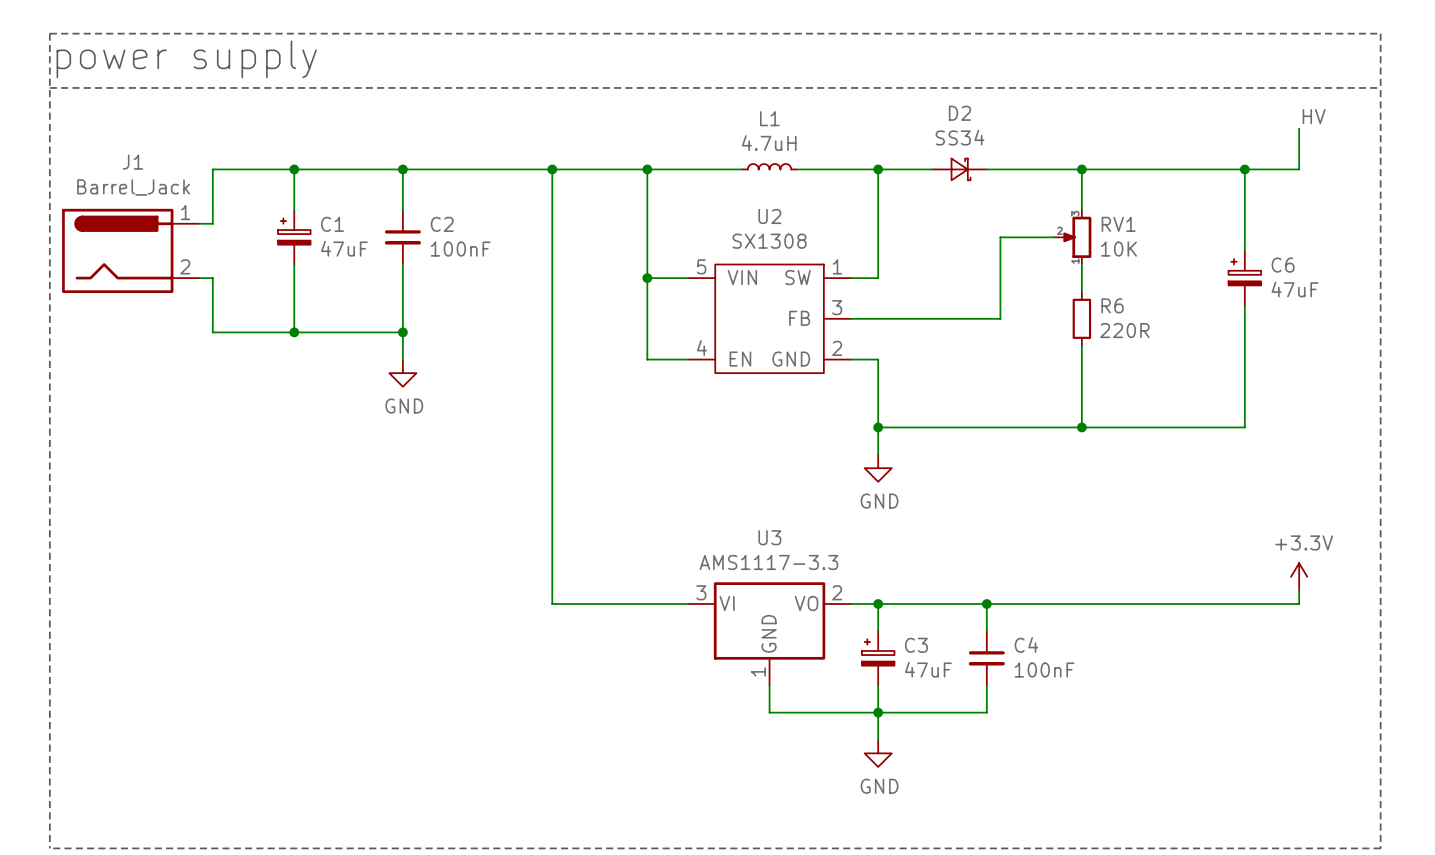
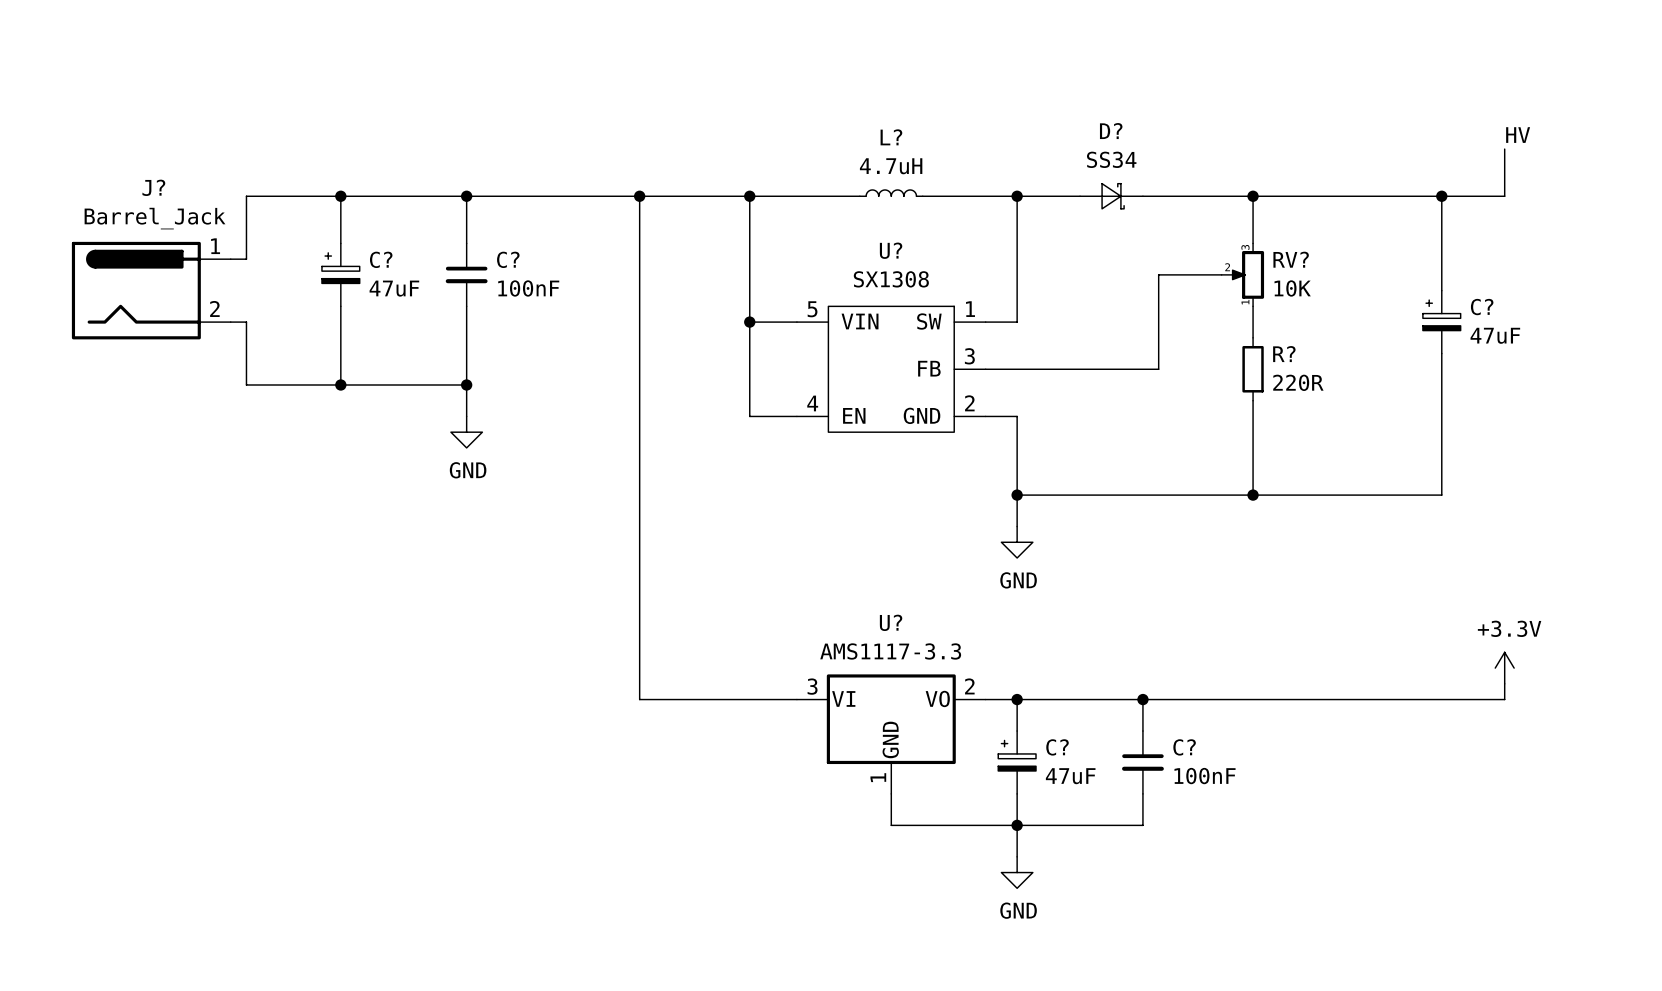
line: (49, 33) (1380, 33) (1380, 848) (49, 848) (49, 33) -> none
text: power supply (186, 59) -> none
line: (49, 87) (1380, 87) -> none
D2 name: D2 (959, 113) -> D? (1111, 131)
L1 name: L1 (769, 118) -> L? (891, 137)
J1 name: J1 (132, 162) -> J? (153, 187)
U2 name: U2 (769, 216) -> U? (891, 250)
C1 name: C1 (332, 224) -> C? (381, 259)
C2 name: C2 (442, 224) -> C? (508, 259)
RV1 name: RV1 (1118, 224) -> RV? (1291, 259)
C6 name: C6 (1283, 265) -> C? (1482, 307)
R6 name: R6 (1112, 305) -> R? (1284, 354)
U3 name: U3 (769, 537) -> U? (891, 622)
C4 name: C4 (1026, 644) -> C? (1184, 747)
C3 name: C3 (916, 645) -> C? (1057, 747)

